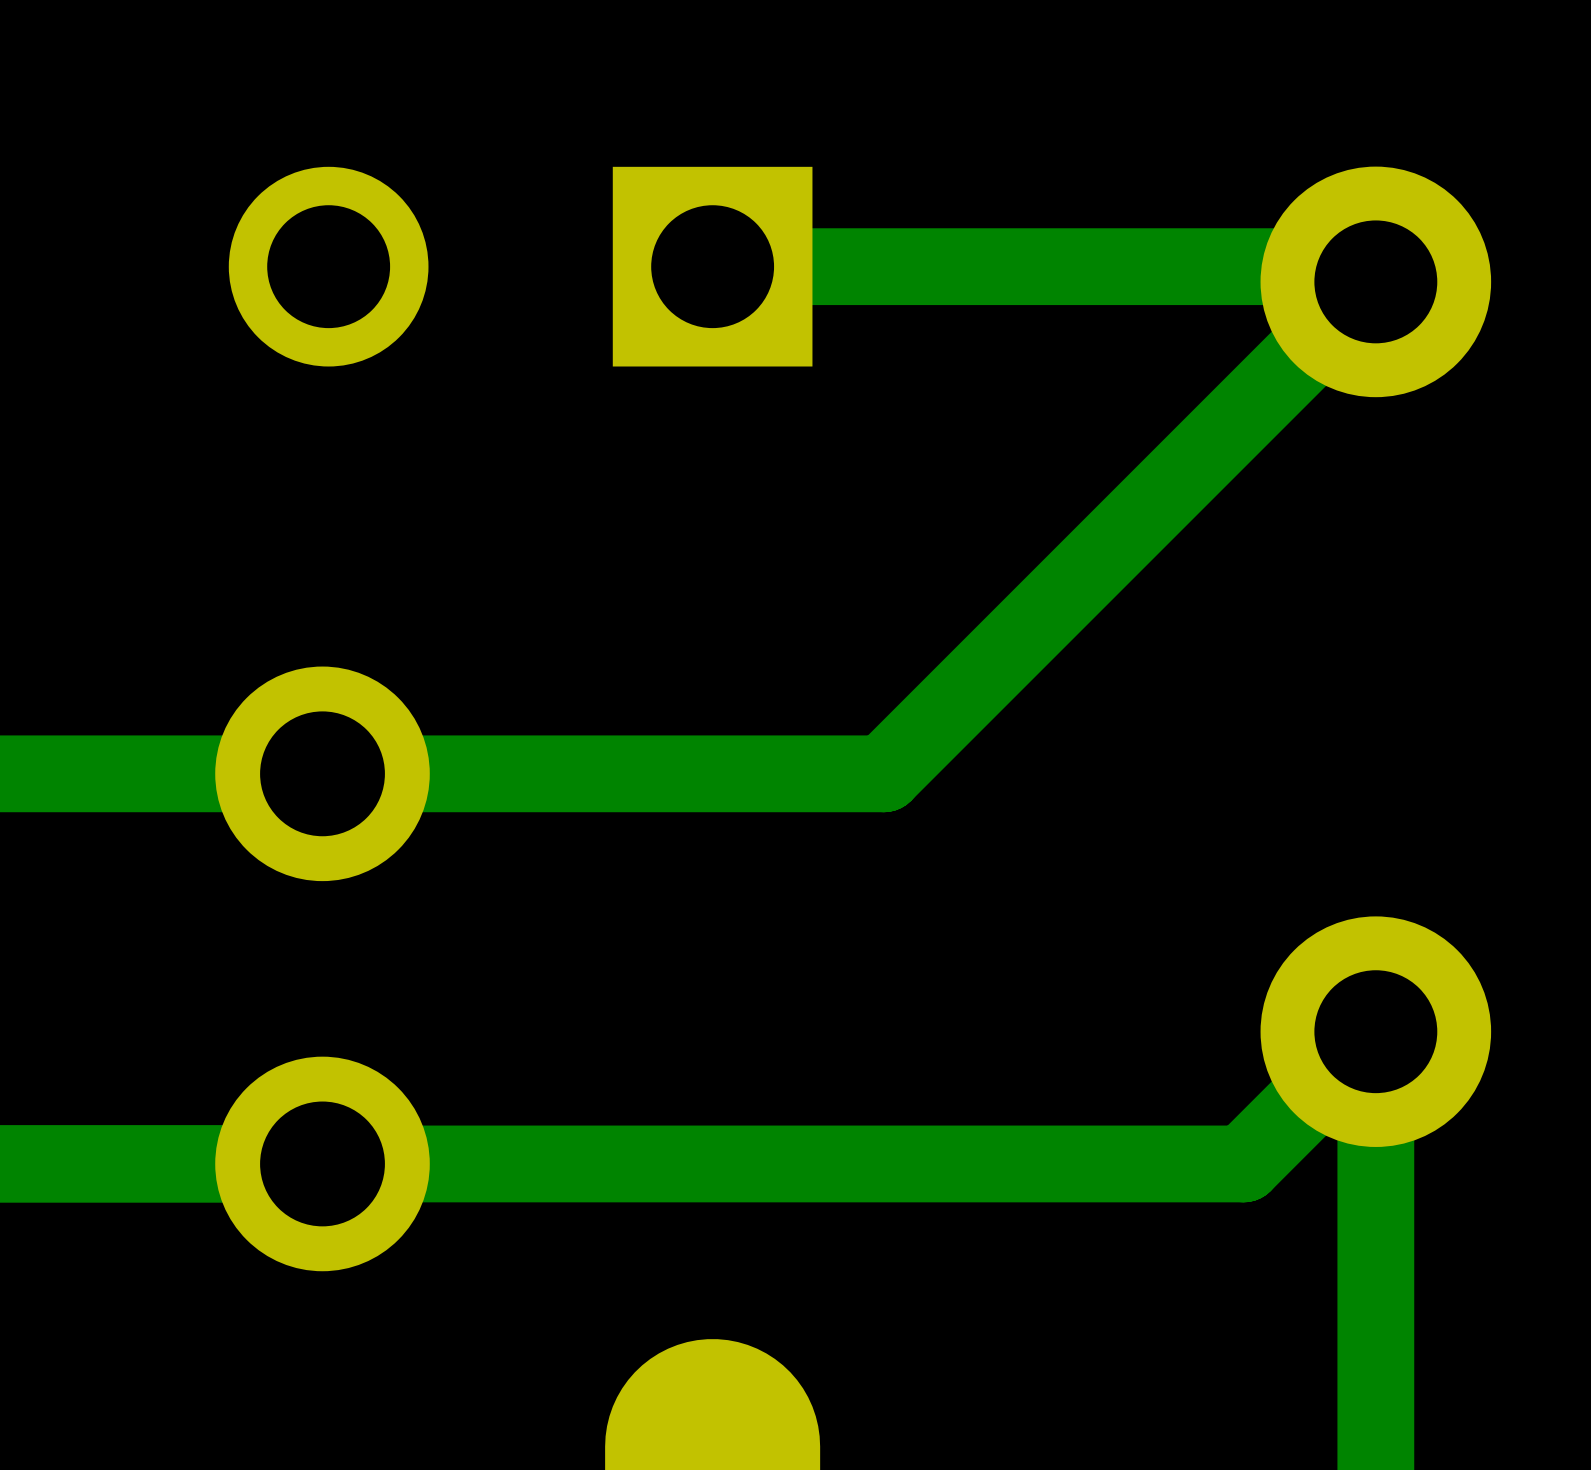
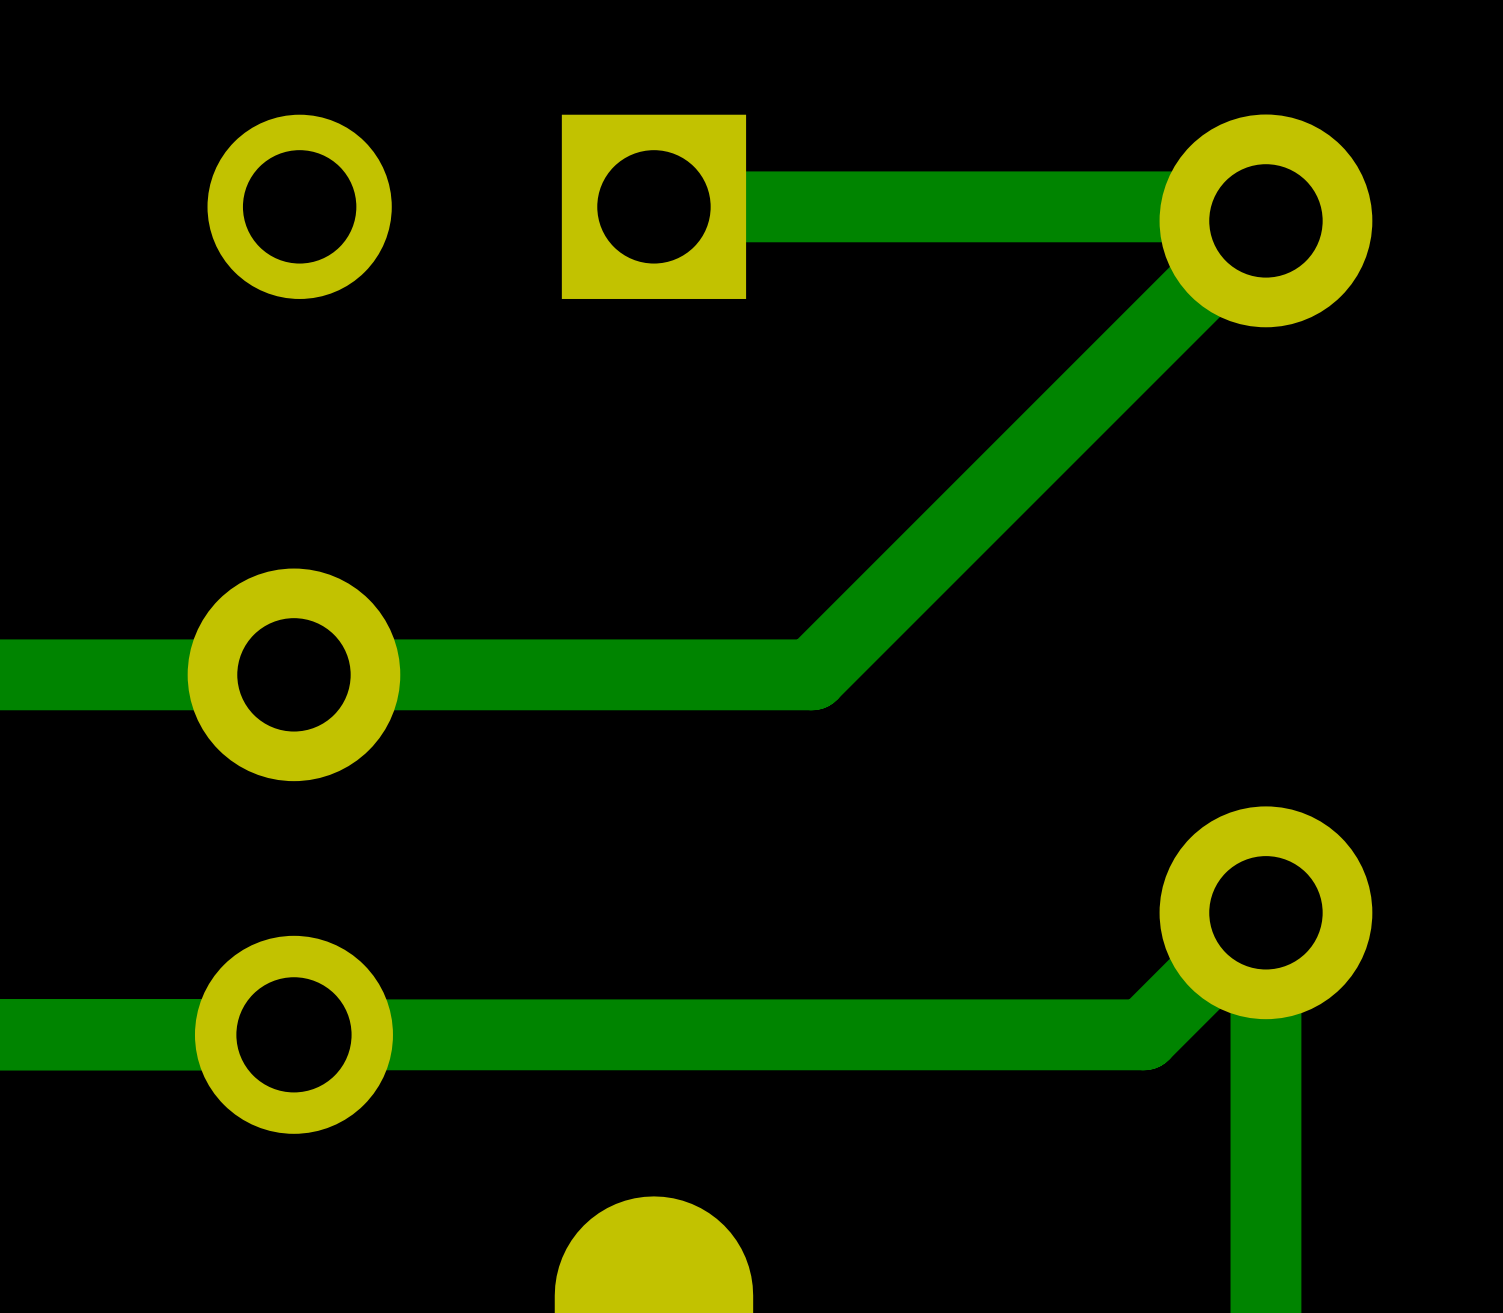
part footprint: [215, 666, 430, 1272] -> [187, 568, 401, 1134]

